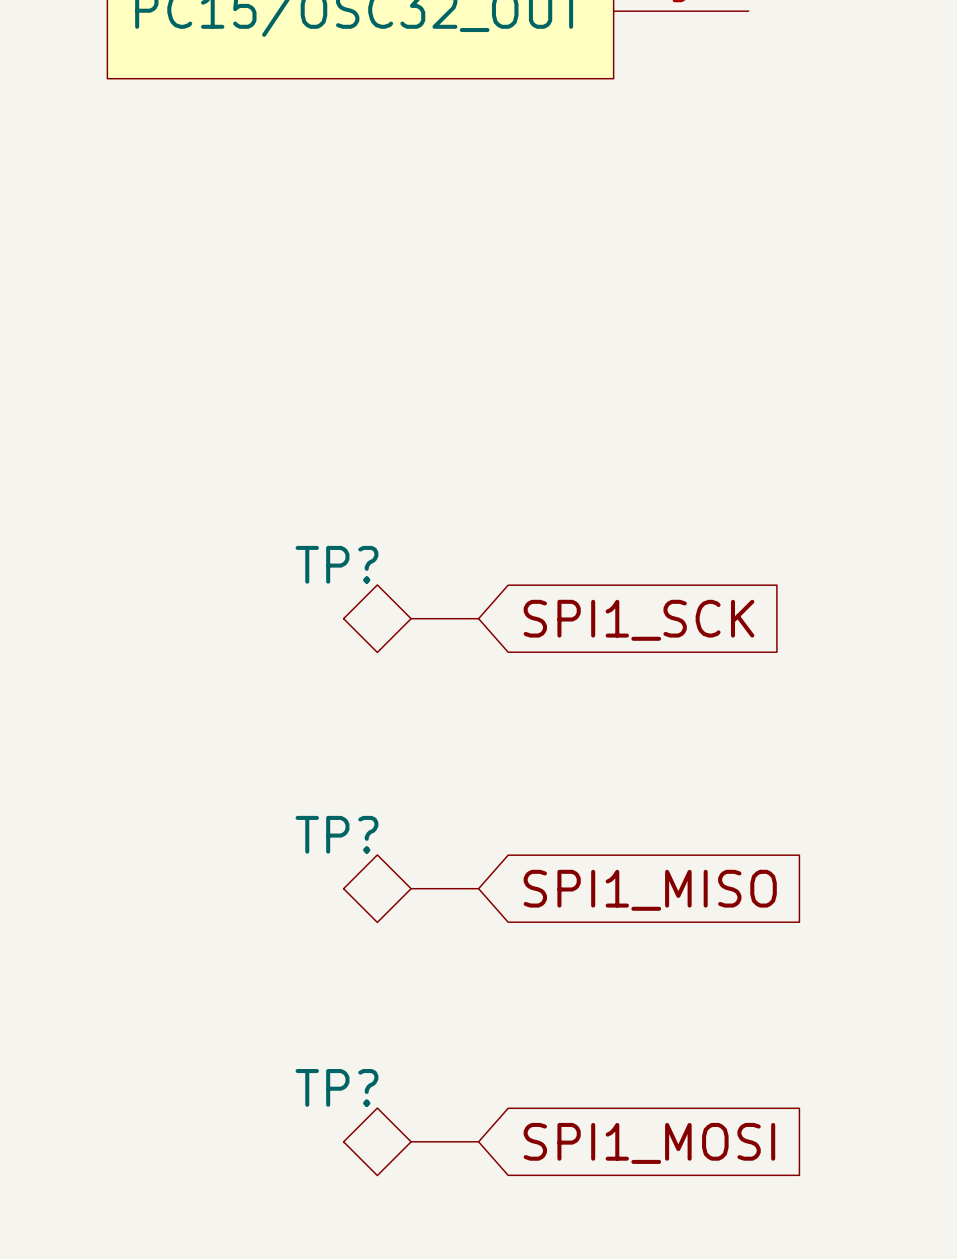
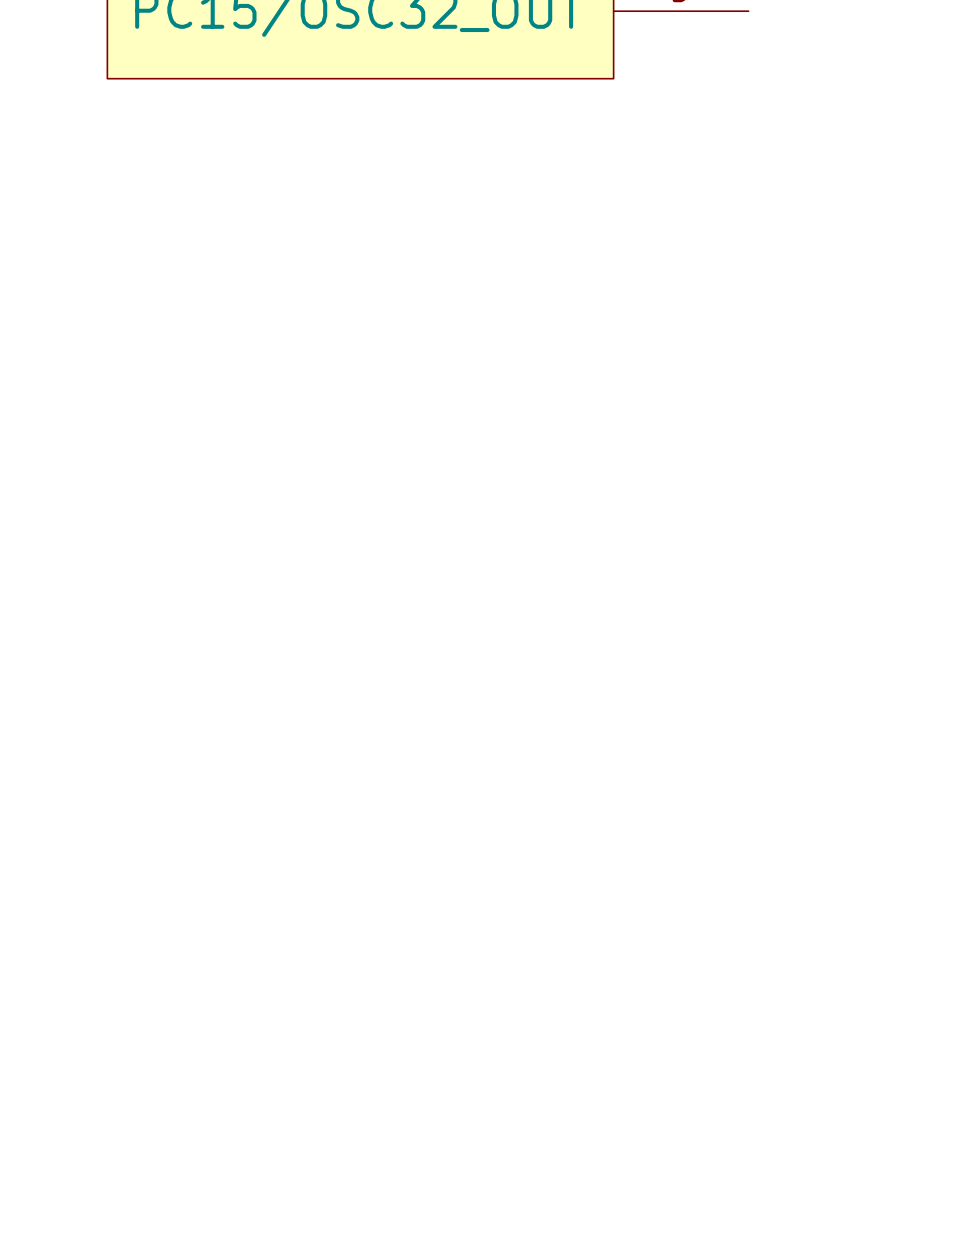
TP?: (411, 618) -> none
global label: SPI1_SCK (638, 620) -> none
TP?: (411, 888) -> none
global label: SPI1_MISO (650, 890) -> none
TP?: (411, 1141) -> none
global label: SPI1_MOSI (649, 1143) -> none

